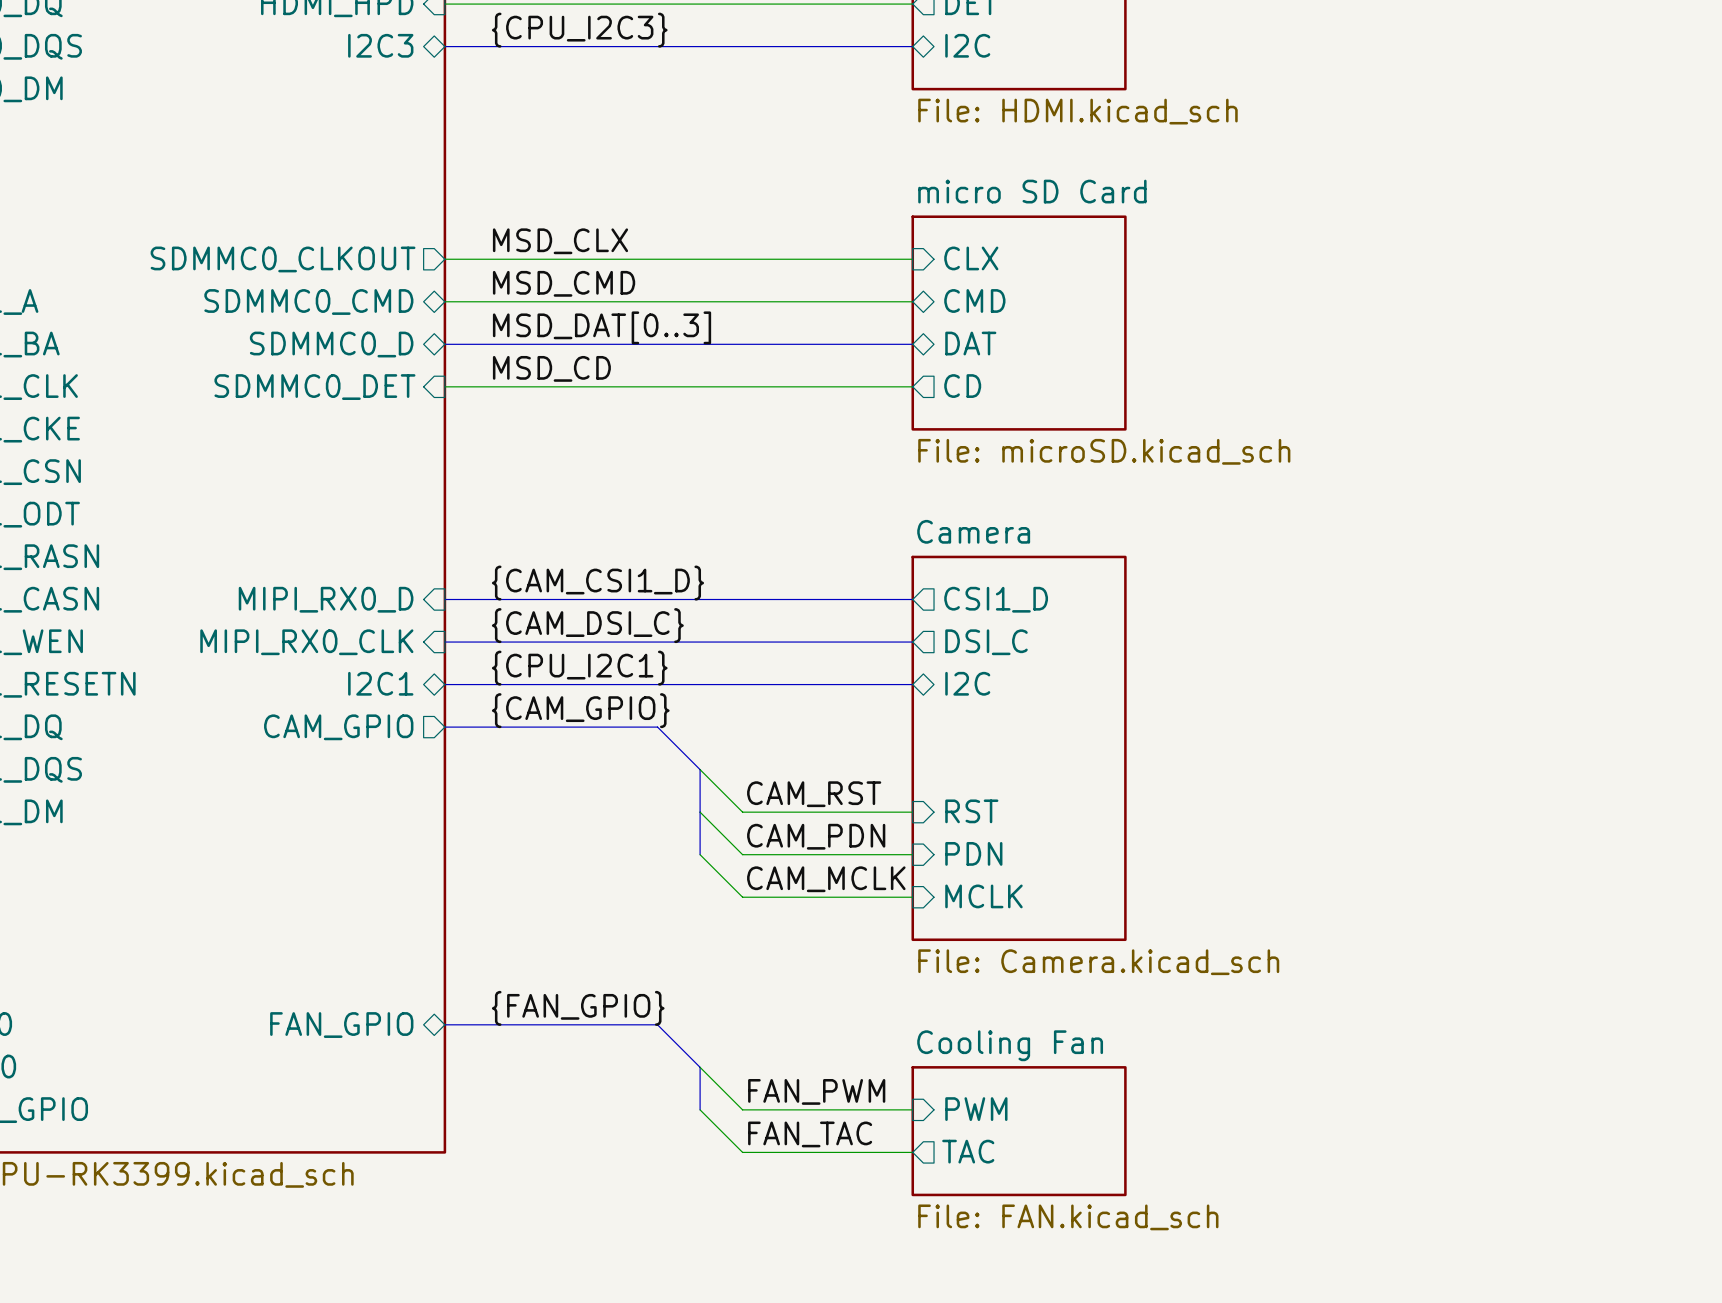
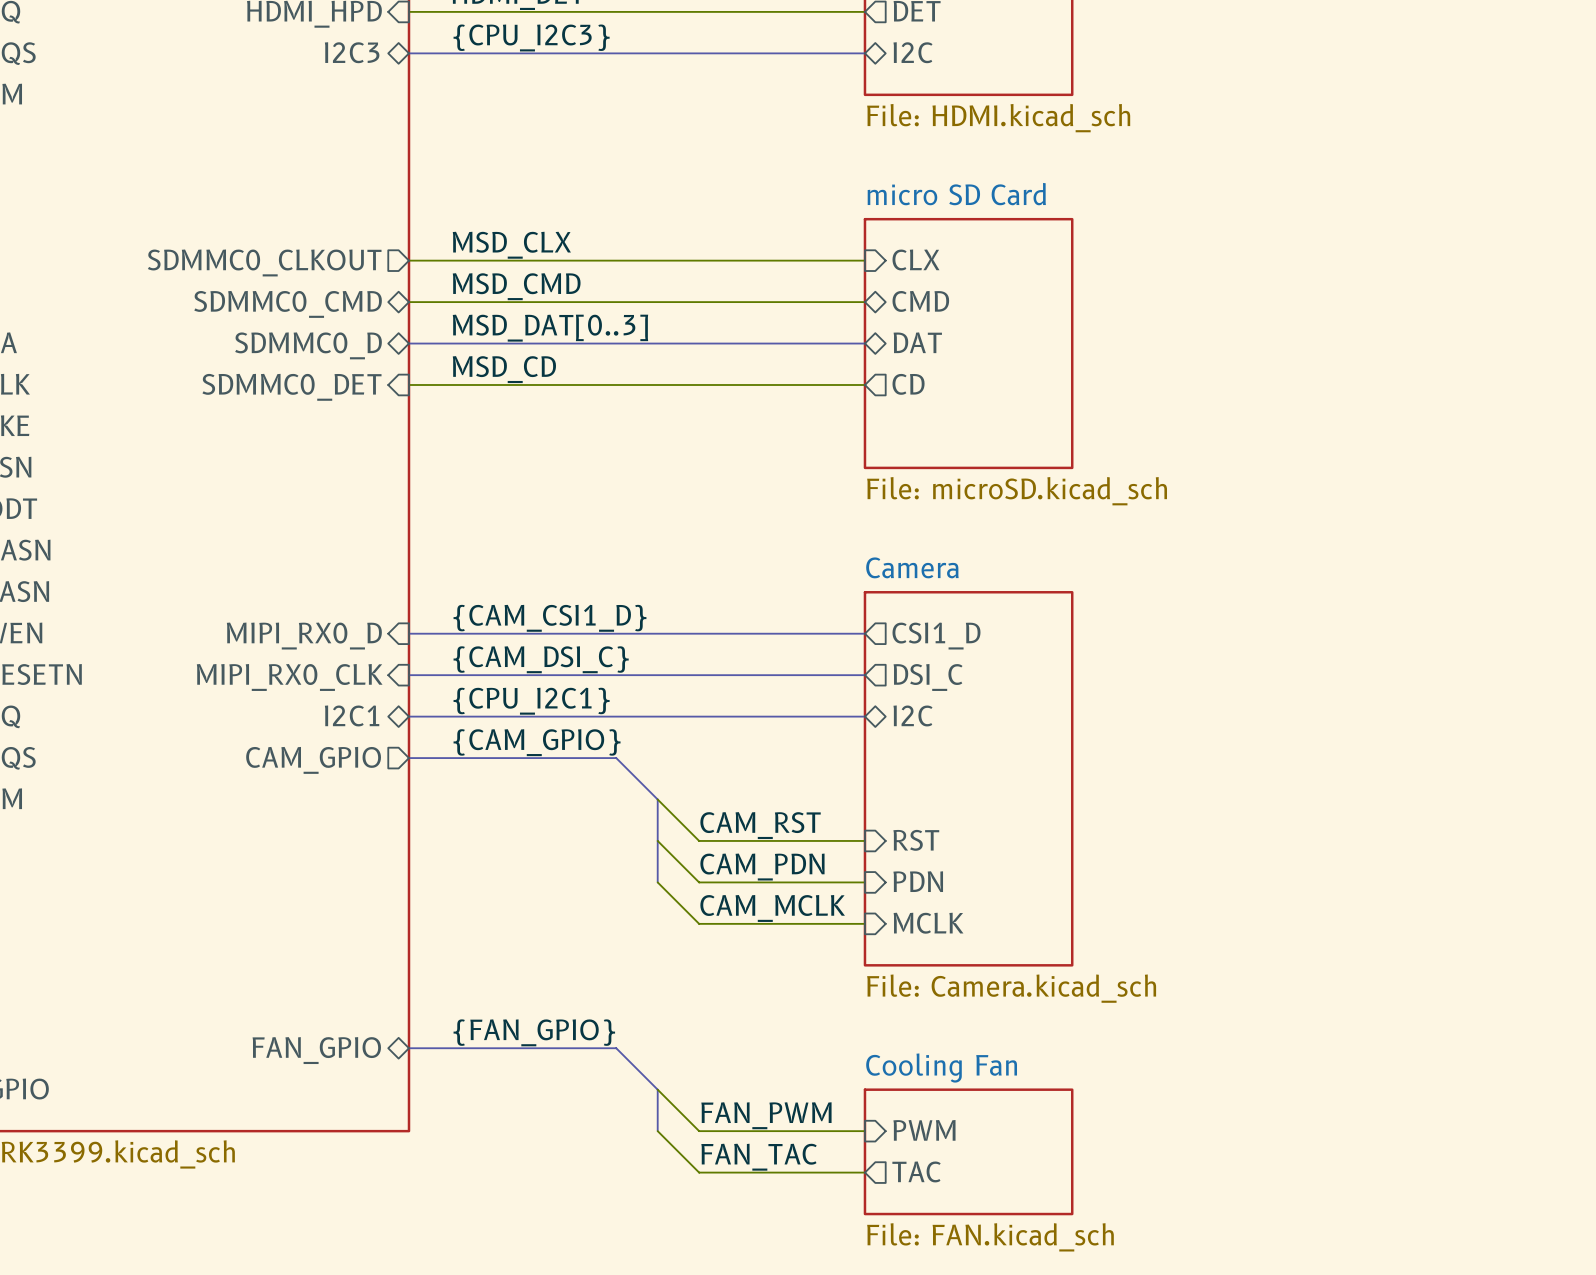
sheet micro SD Card: File: microSD.kicad_sch (1019, 323) -> none
sheet micro SD Card: none -> File: microSD.kicad_sch (968, 343)
label: {CAM_CSI1_D} (597, 583) -> none
sheet pin: MIPI_RX0_D (326, 599) -> none
bus: (444, 599) (912, 599) -> none
sheet pin: CSI1_D (996, 599) -> none
label: {CAM_DSI_C} (587, 625) -> {CAM_CSI1_D} (549, 618)
sheet pin: MIPI_RX0_CLK (306, 642) -> MIPI_RX0_D (304, 636)
sheet pin: DSI_C (986, 642) -> CSI1_D (936, 636)
label: {CPU_I2C1} (579, 668) -> {CAM_DSI_C} (541, 659)
sheet pin shape: bidirectional (380, 683) -> input (289, 677)
sheet pin: I2C1 (380, 683) -> MIPI_RX0_CLK (289, 677)
sheet pin shape: bidirectional (967, 683) -> output (928, 677)
sheet pin: I2C (967, 683) -> DSI_C (928, 677)
label: {CAM_GPIO} (580, 710) -> {CPU_I2C1} (531, 701)
sheet pin: none -> I2C (912, 715)
sheet pin shape: output (338, 727) -> bidirectional (352, 715)
sheet pin: CAM_GPIO (338, 727) -> I2C1 (352, 715)
bus: (657, 727) (700, 769) (700, 812) -> (408, 758) (616, 758) (657, 799)
bus: none -> (616, 716) (864, 716)
sheet Camera position: (1019, 748) -> (968, 778)
label: none -> {CAM_GPIO} (537, 742)
sheet pin: none -> CAM_GPIO (313, 760)
wire: (700, 769) (742, 812) (912, 812) -> (657, 882) (699, 923) (864, 923)
label: CAM_RST (814, 794) -> none
sheet pin: RST (971, 811) -> none
label: CAM_PDN (816, 836) -> CAM_RST (760, 825)
sheet pin: PDN (973, 853) -> RST (916, 840)
bus: none -> (657, 840) (657, 882)
label: CAM_MCLK (826, 879) -> CAM_PDN (762, 867)
sheet pin: MCLK (983, 896) -> PDN (918, 881)
label: none -> CAM_MCLK (772, 908)
sheet pin: none -> MCLK (928, 923)
label position: {FAN_GPIO} (578, 1008) -> {FAN_GPIO} (534, 1032)
bus: (444, 1024) (657, 1024) (700, 1067) (700, 1109) -> (408, 1048) (616, 1048) (657, 1089) (657, 1131)
sheet pin position: FAN_GPIO (341, 1025) -> FAN_GPIO (316, 1050)
wire: (700, 1067) (742, 1109) (912, 1109) -> (657, 1131) (699, 1172) (864, 1172)
label: FAN_PWM (816, 1091) -> none
sheet pin: PWM (976, 1109) -> none
sheet Cooling Fan position: (1019, 1131) -> (968, 1151)
label: FAN_TAC (810, 1134) -> FAN_PWM (766, 1115)
sheet pin shape: output (968, 1151) -> input (924, 1130)
sheet pin: TAC (968, 1151) -> PWM (924, 1130)
label: none -> FAN_TAC (759, 1157)
sheet pin: none -> TAC (916, 1171)

